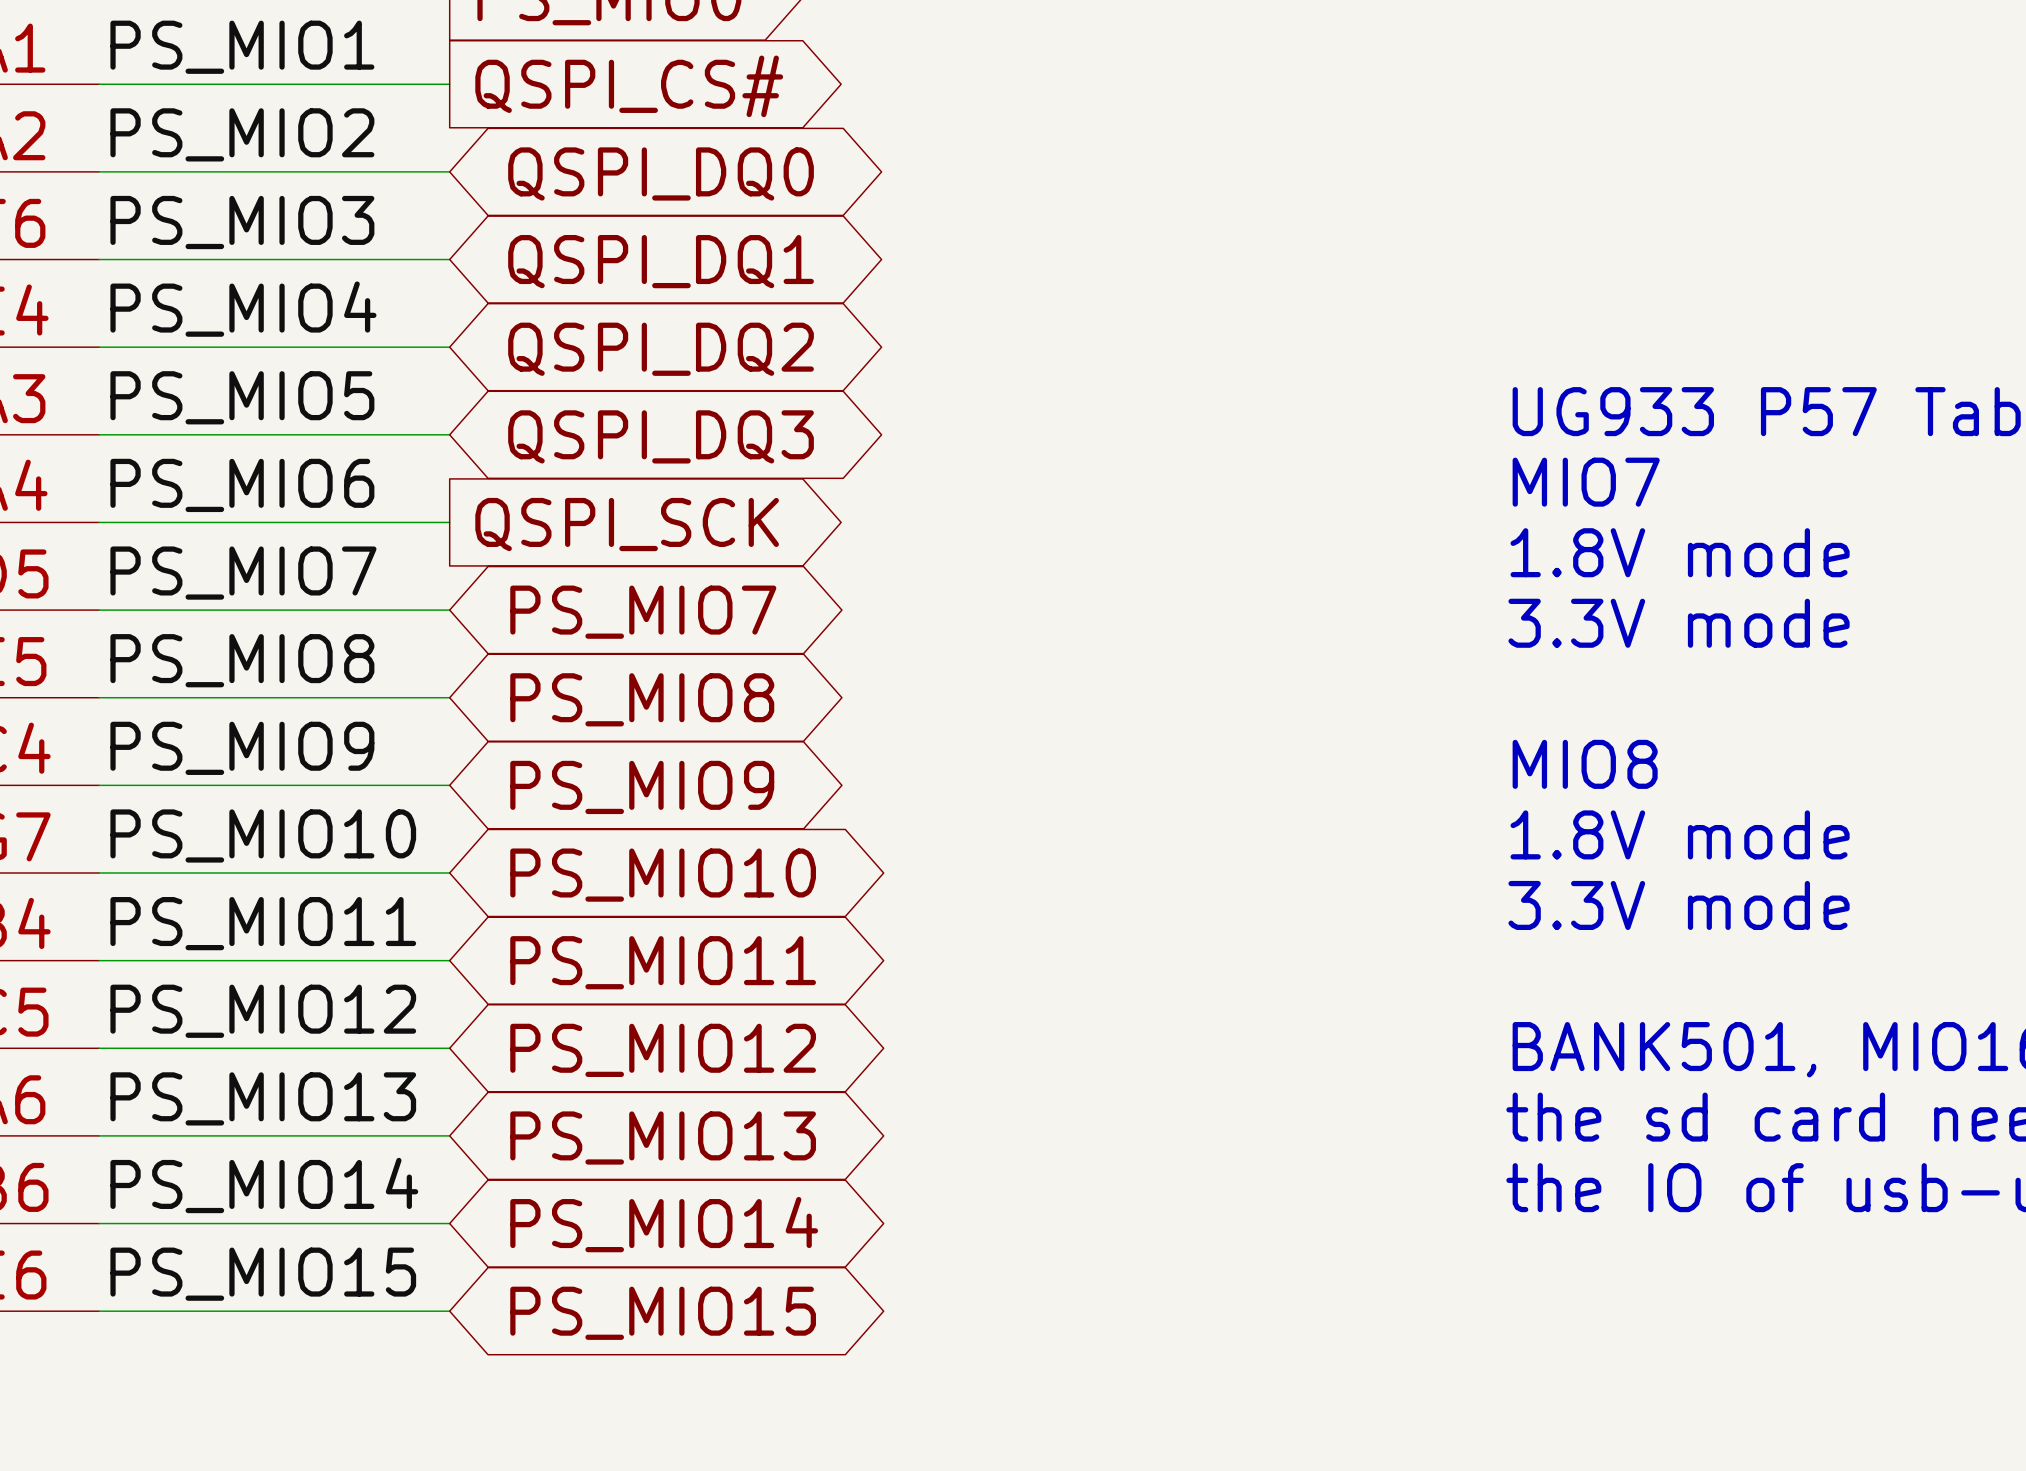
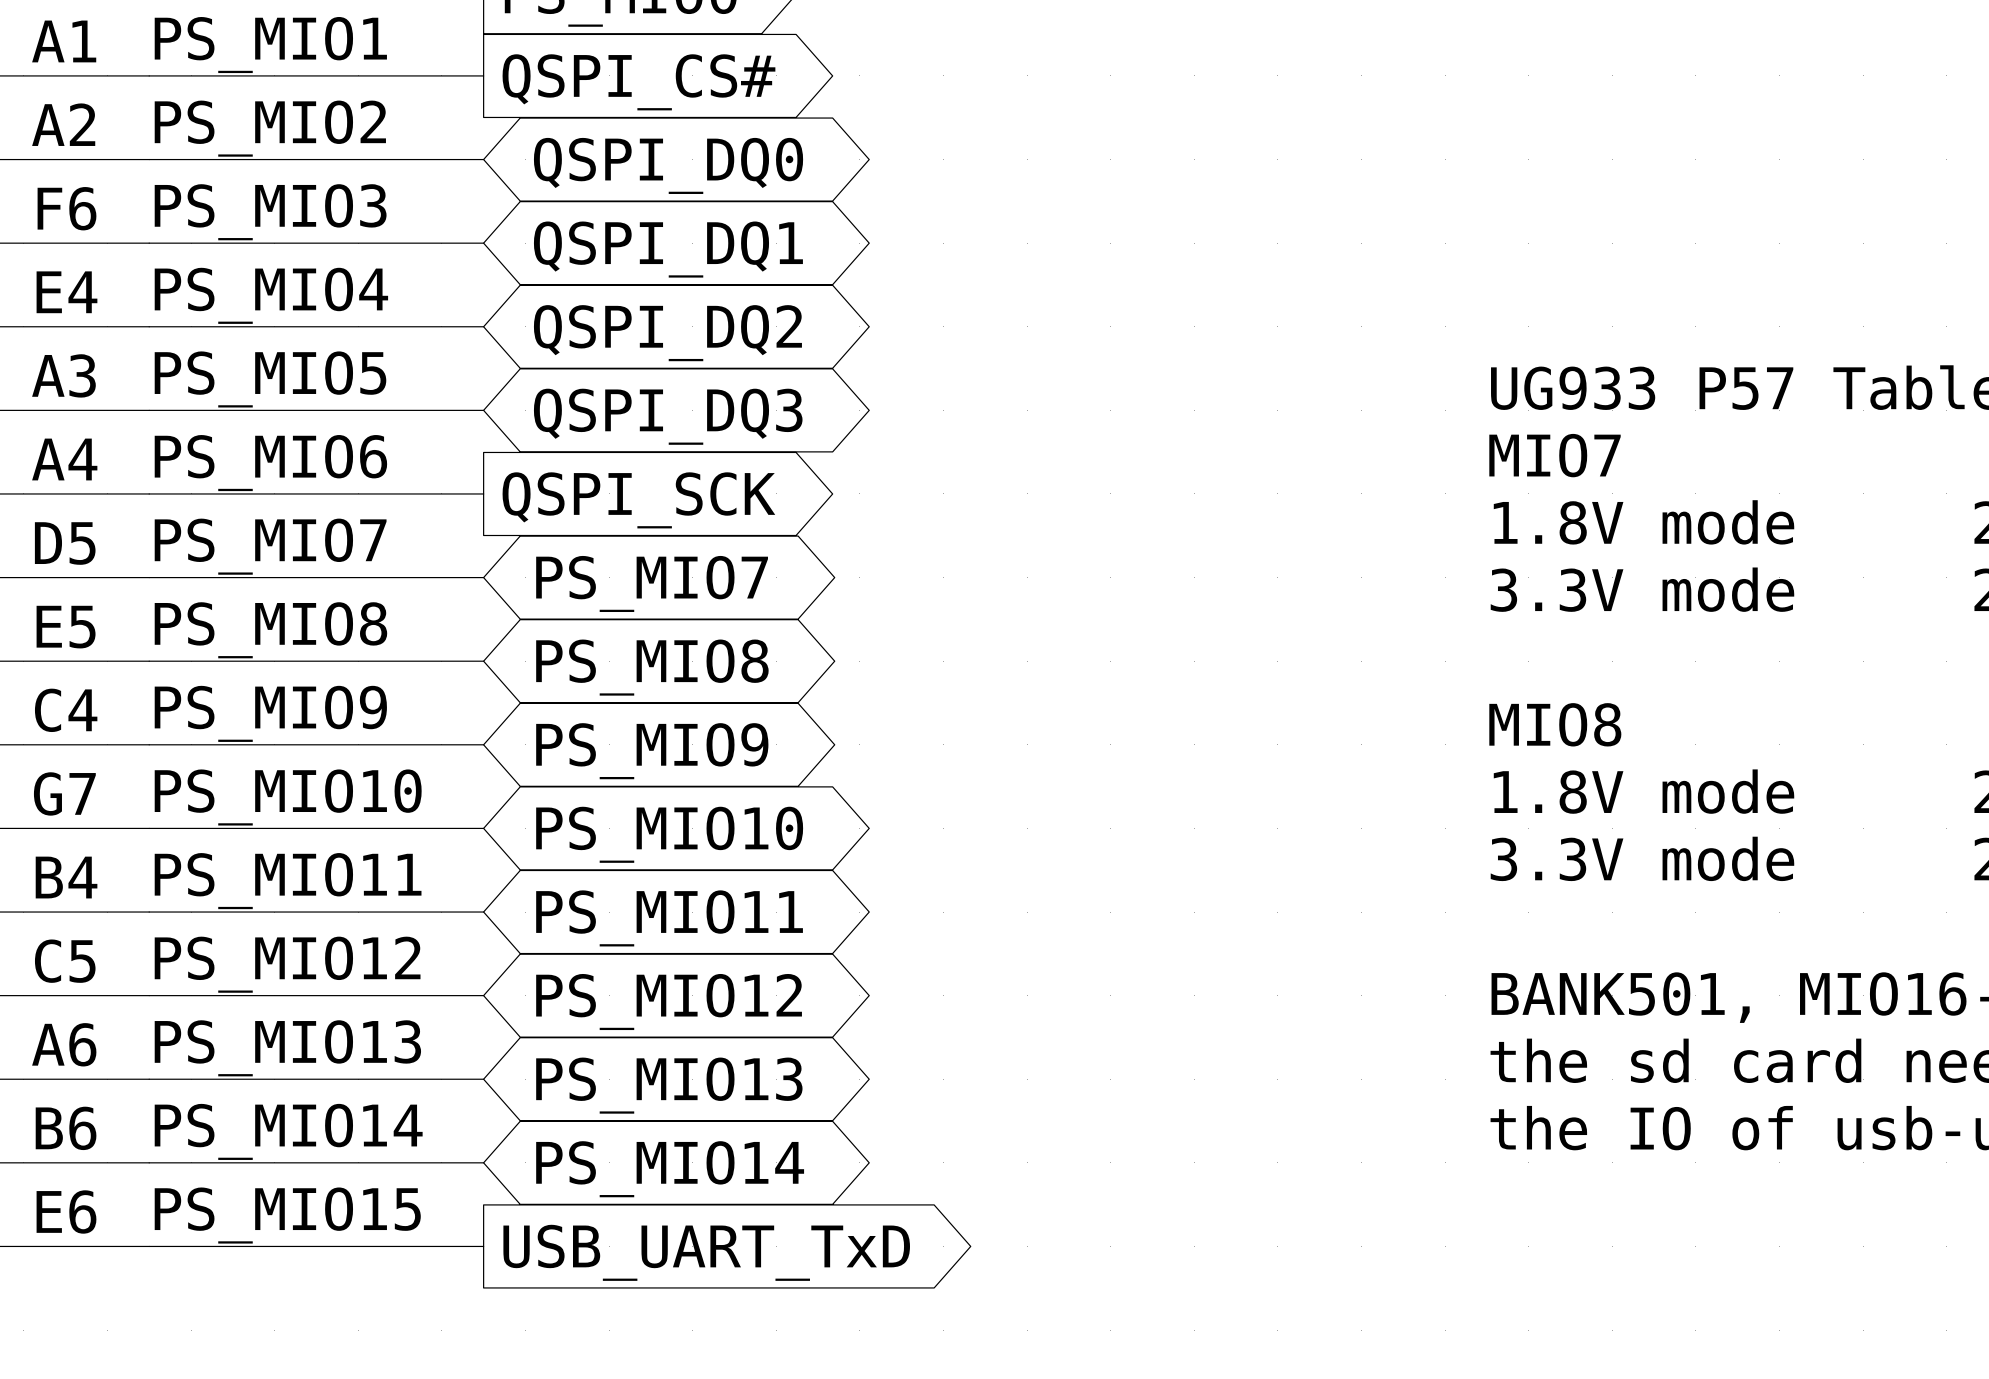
global label shape: bidirectional (663, 1313) -> output (706, 1252)
global label: PS_MIO15 (663, 1313) -> USB_UART_TxD (706, 1252)

